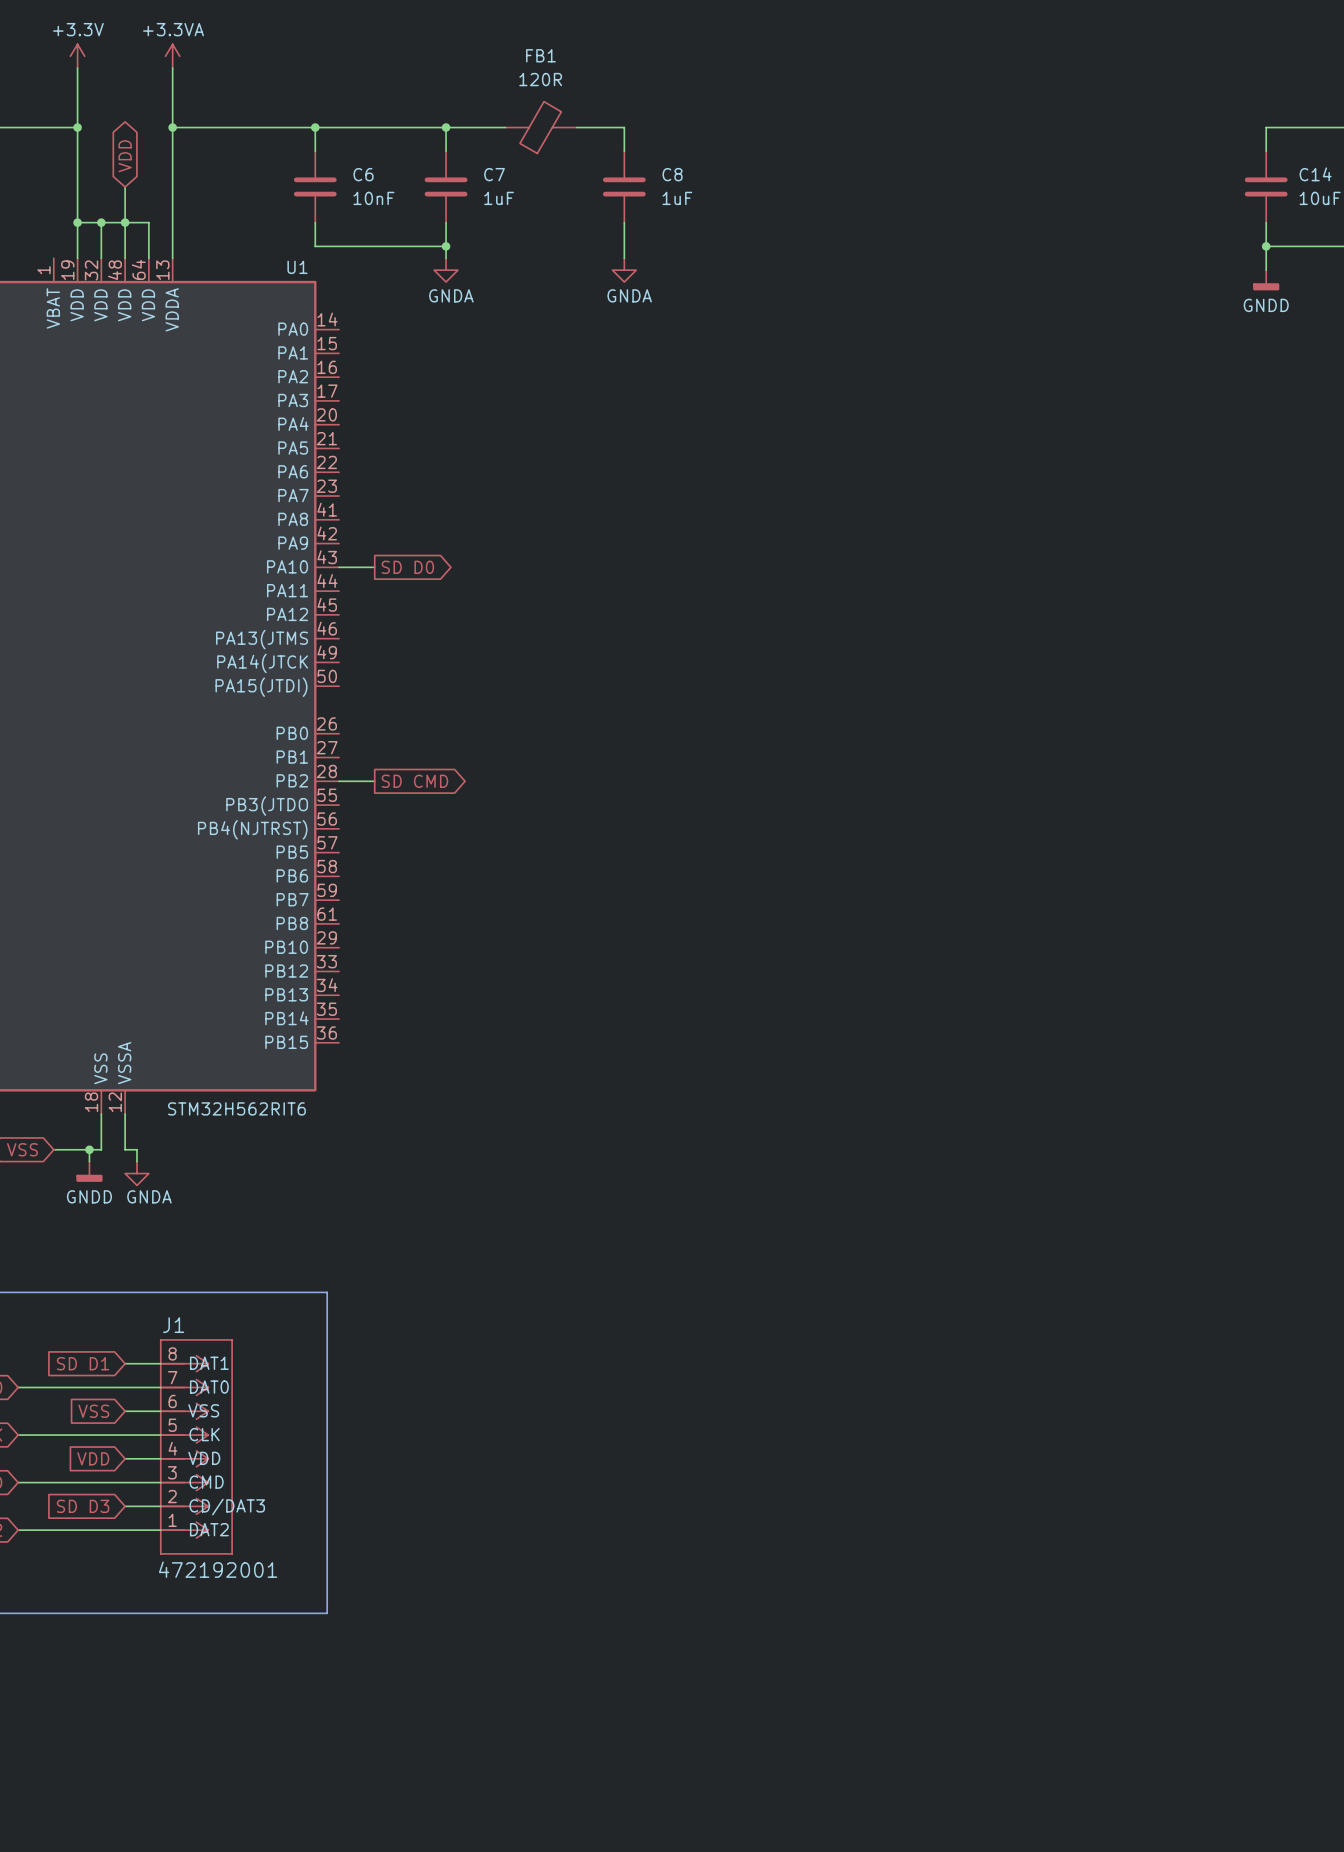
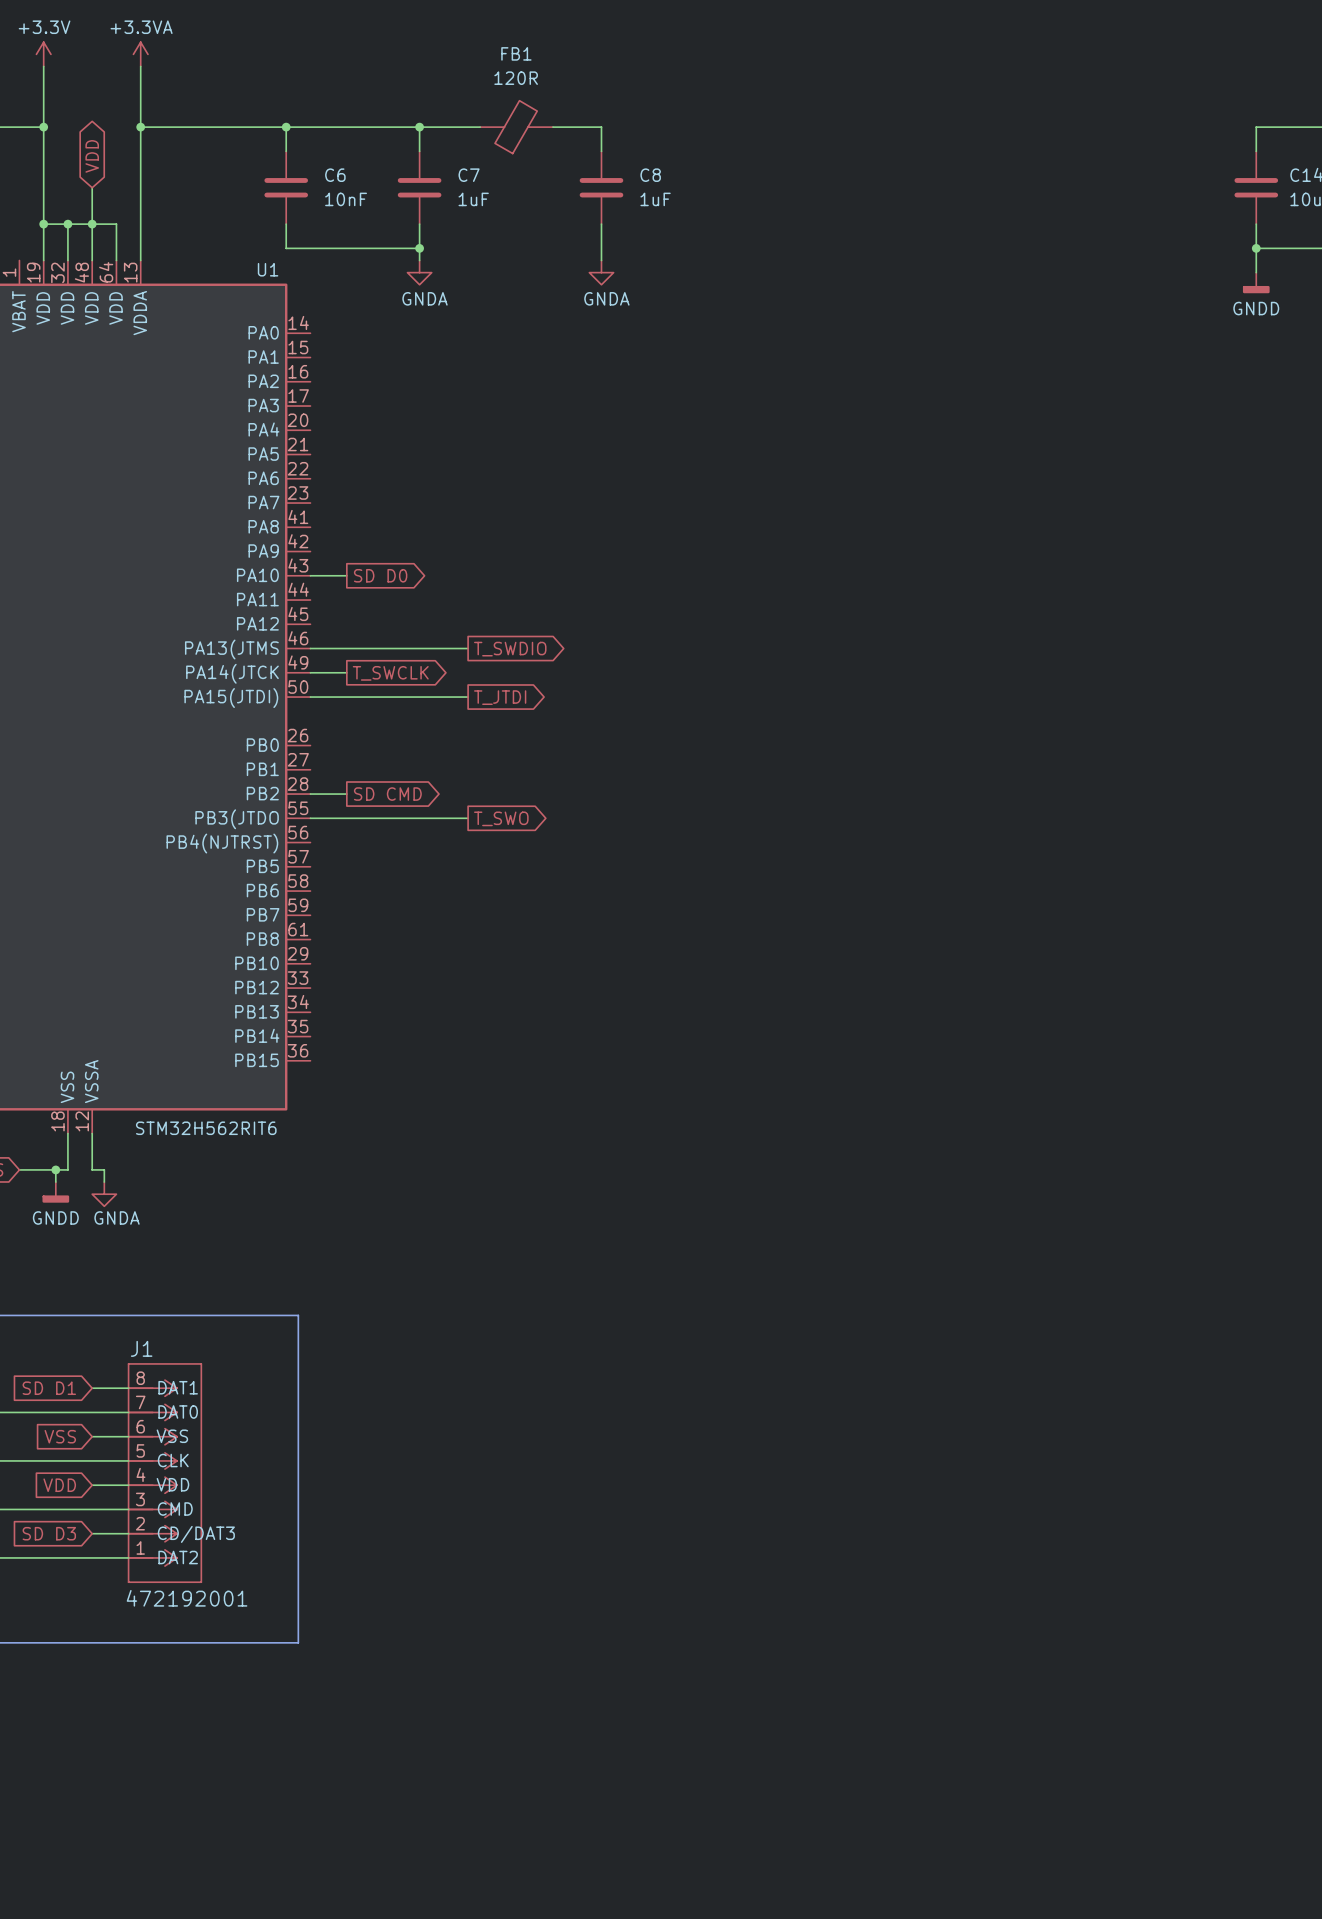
wire: none -> (310, 648) (468, 648)
global label: none -> T_SWDIO (510, 649)
wire: none -> (310, 672) (346, 672)
global label: none -> T_SWCLK (390, 673)
wire: none -> (310, 697) (468, 697)
global label: none -> T_JTDI (500, 697)
wire: none -> (310, 818) (468, 818)
global label: none -> T_SWO (501, 818)

